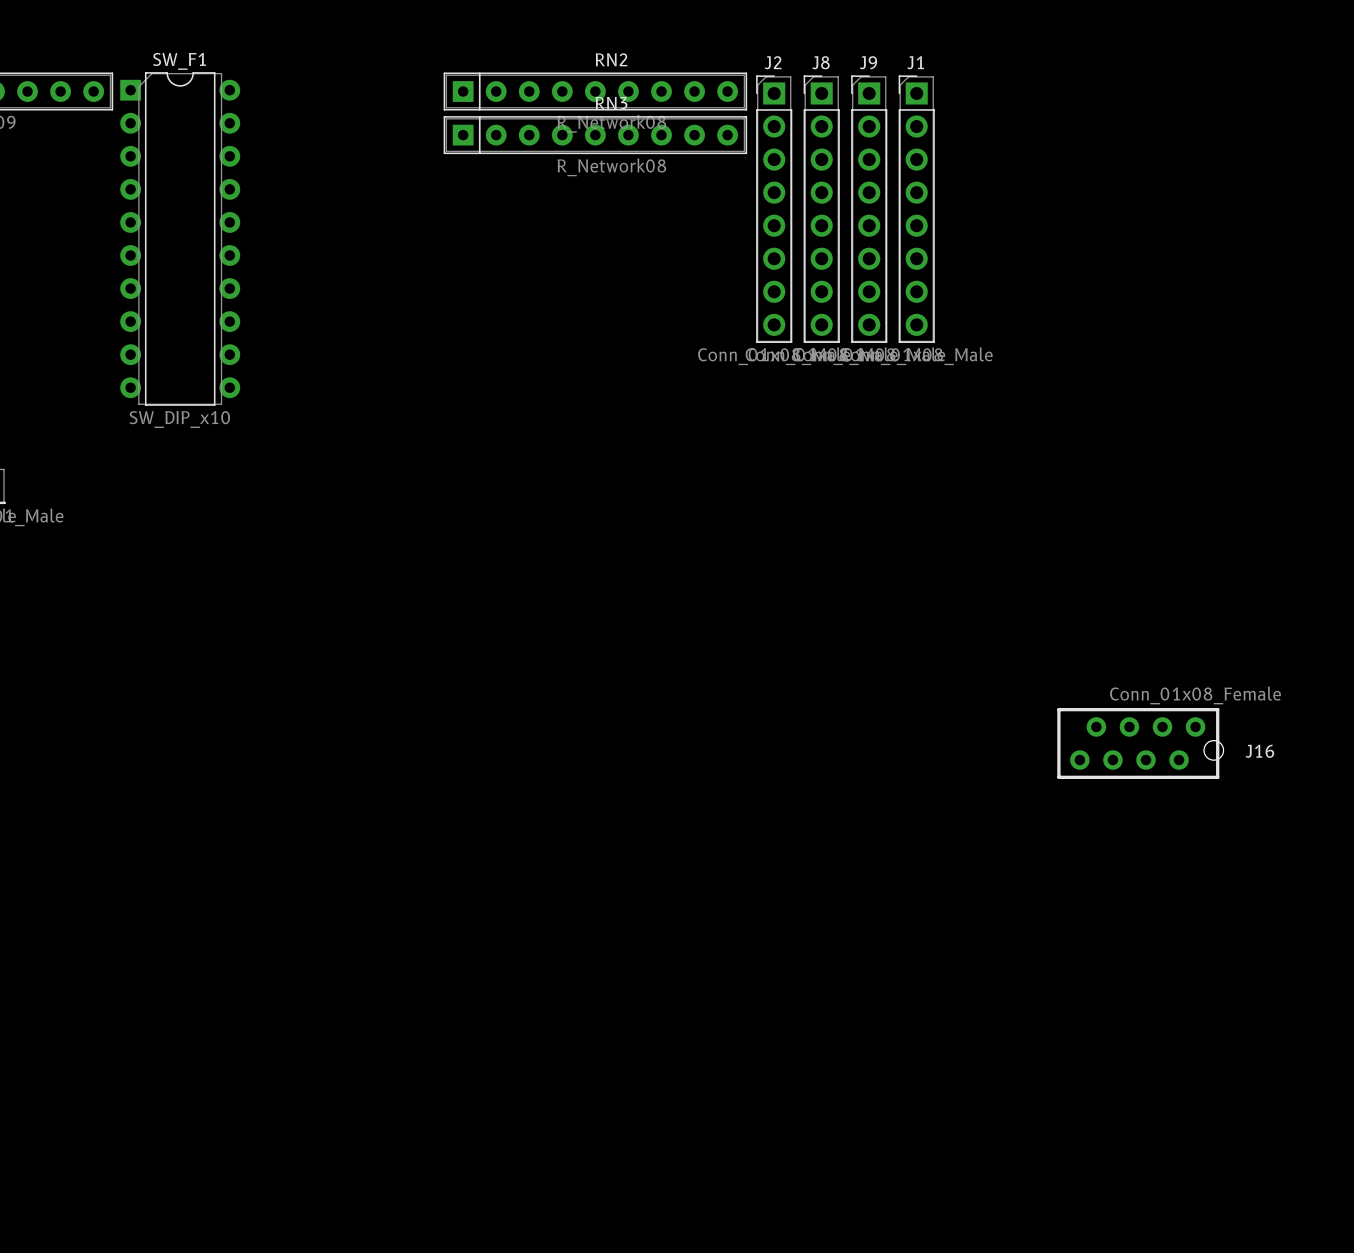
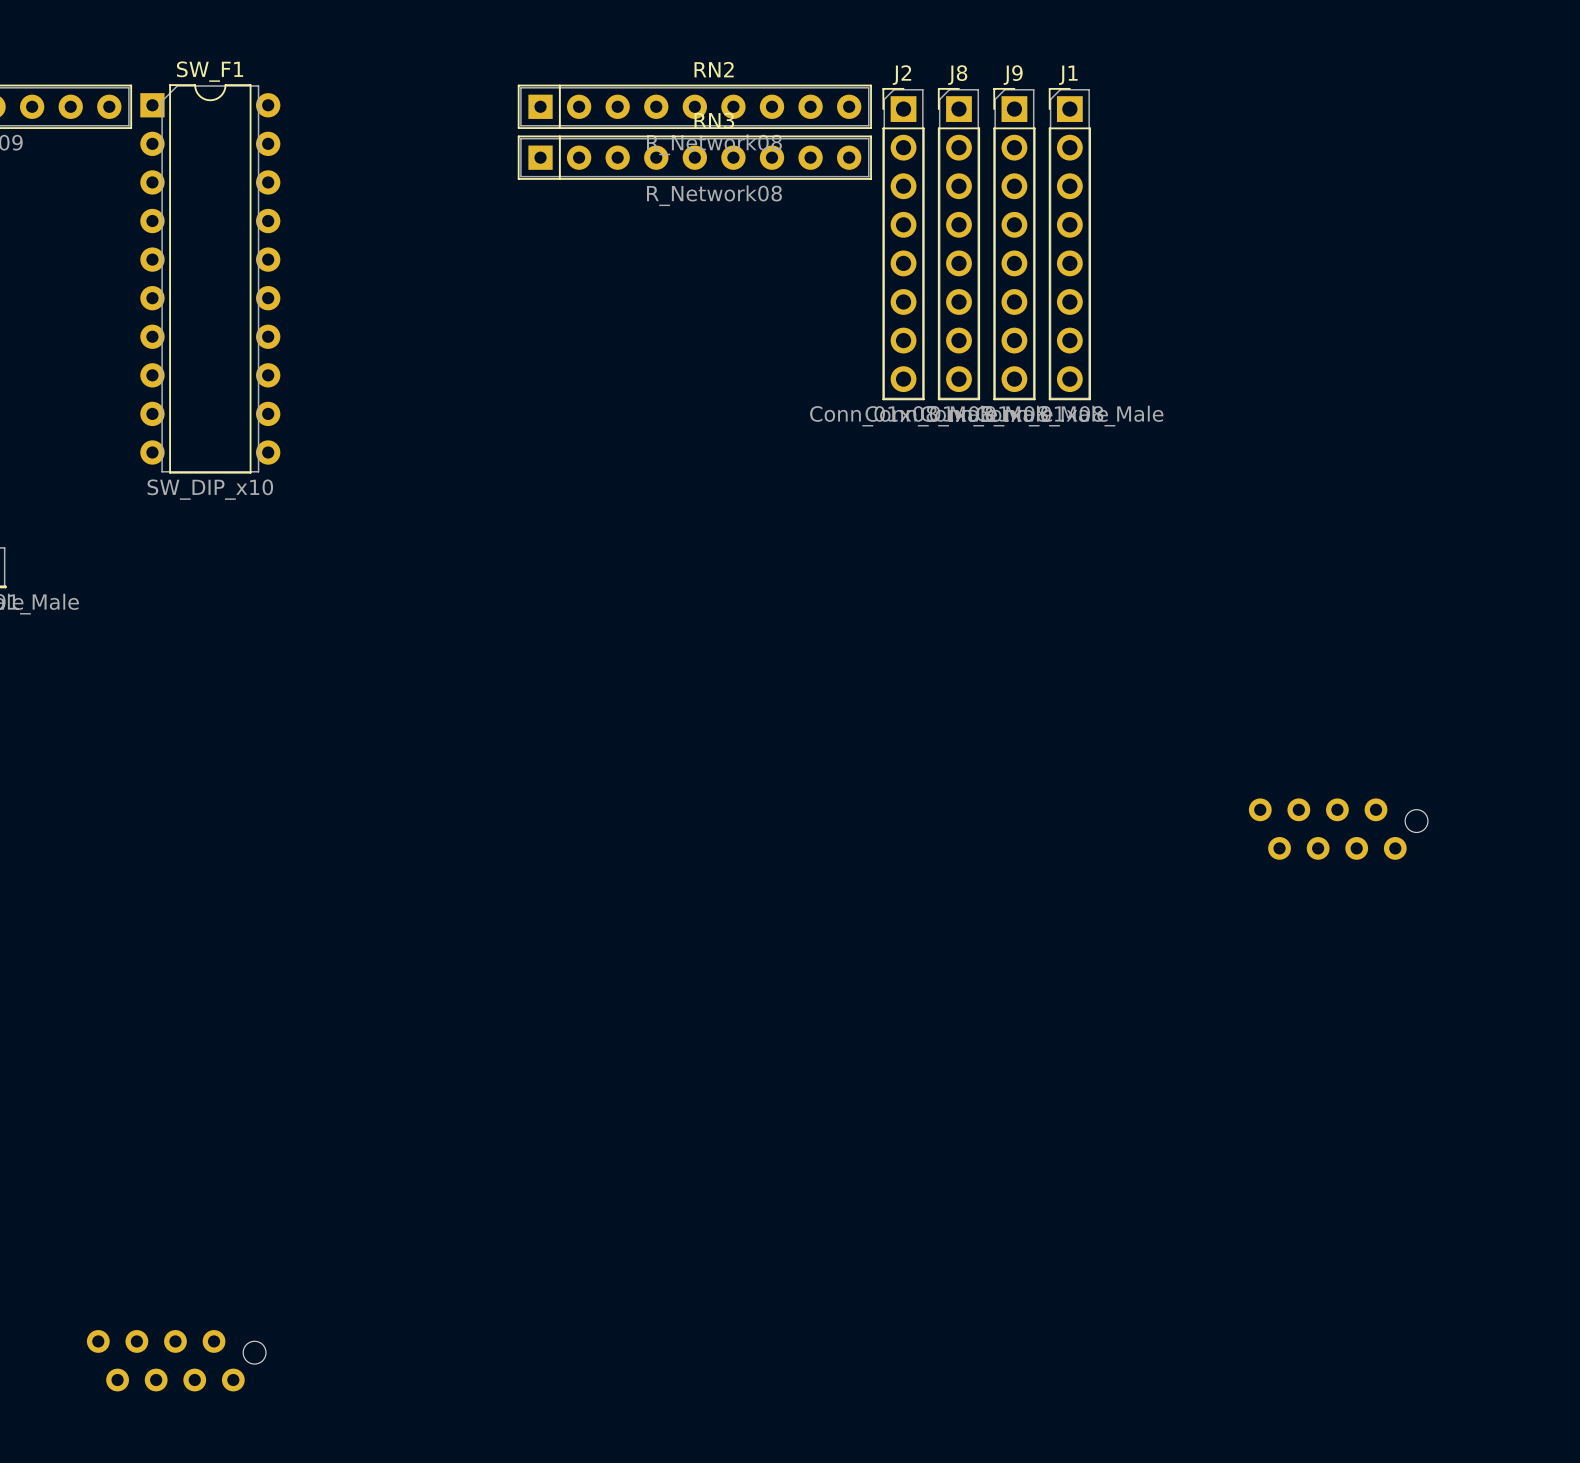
J16 side: top (1140, 743) -> bottom (1338, 829)
part: none -> (176, 1360)

